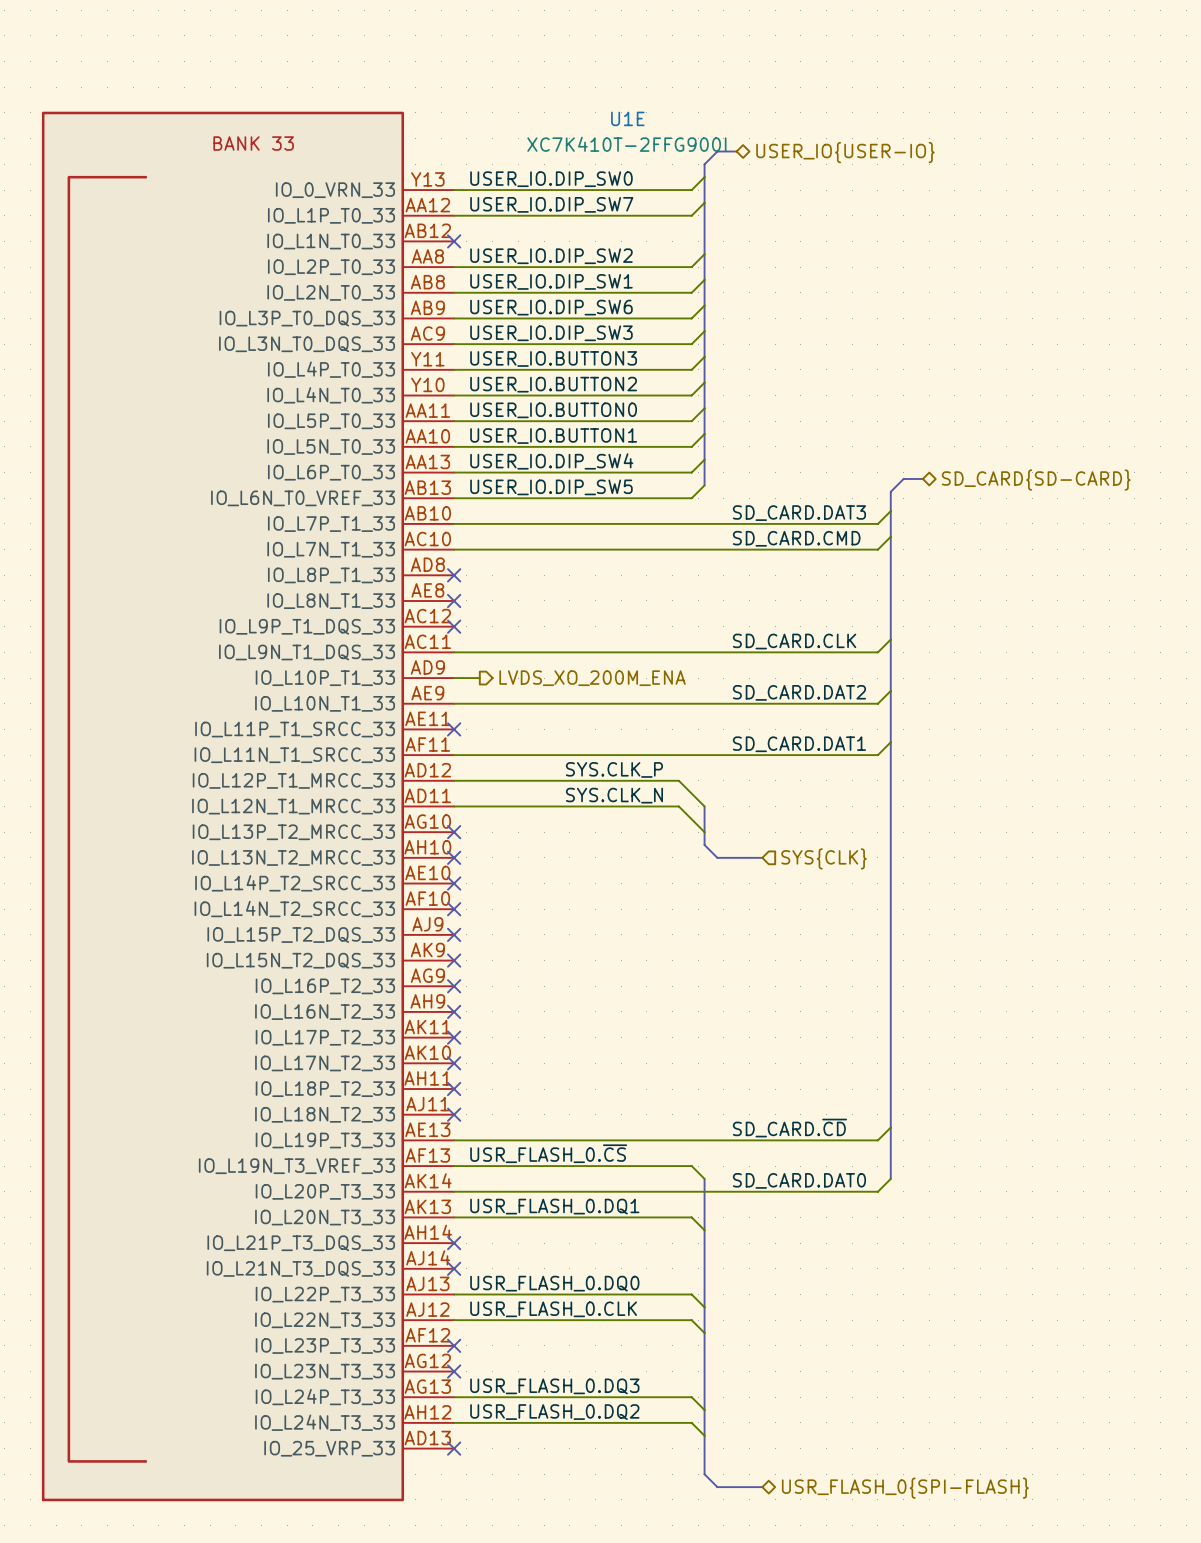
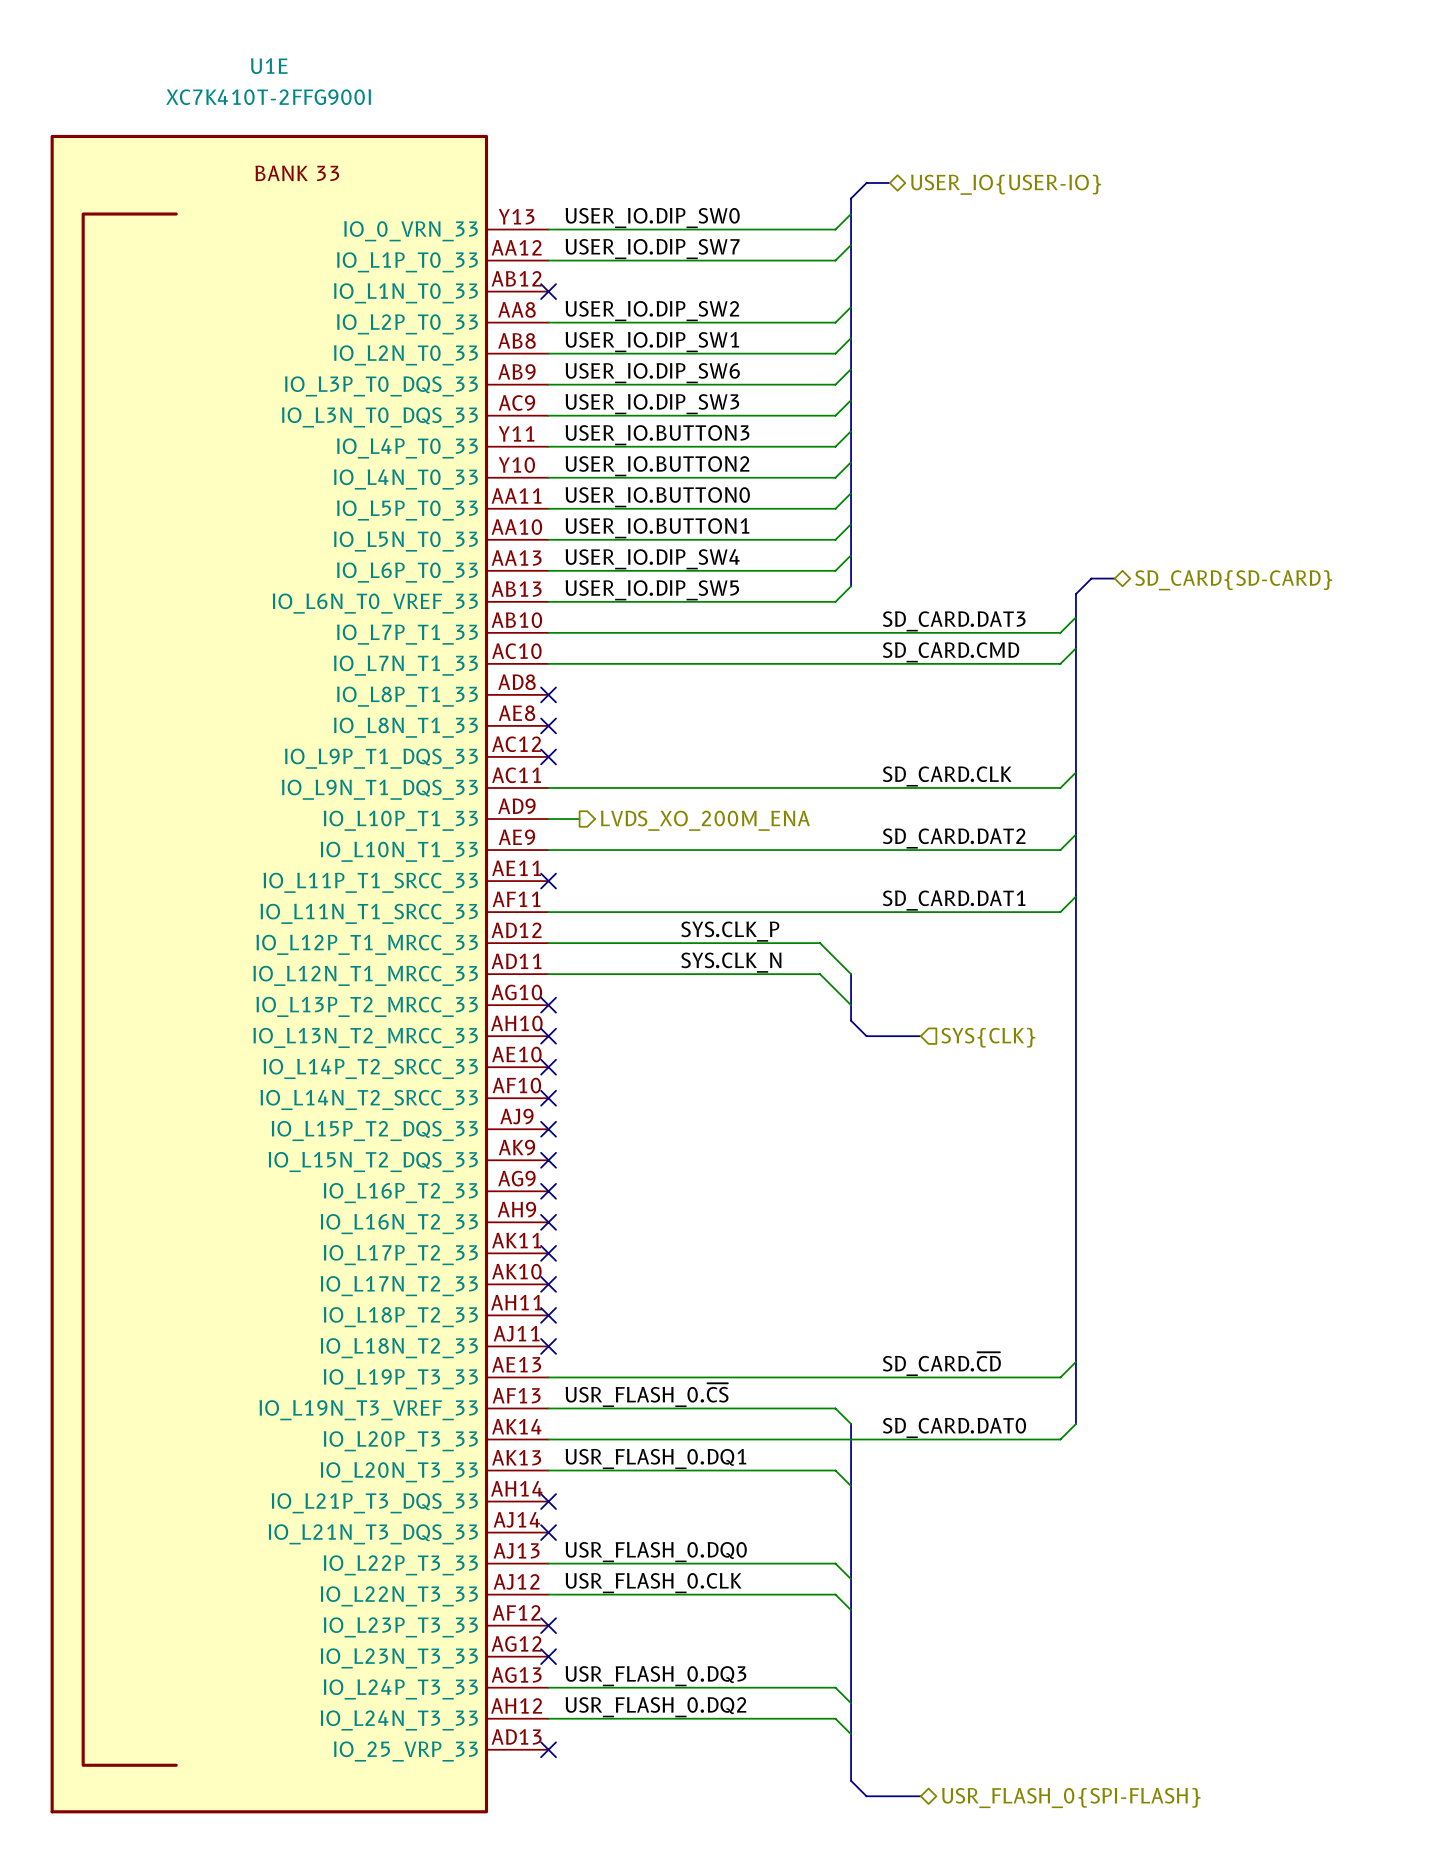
U1E name position: U1E (627, 118) -> U1E (269, 66)
U1E value position: XC7K410T-2FFG900I (626, 144) -> XC7K410T-2FFG900I (268, 97)

